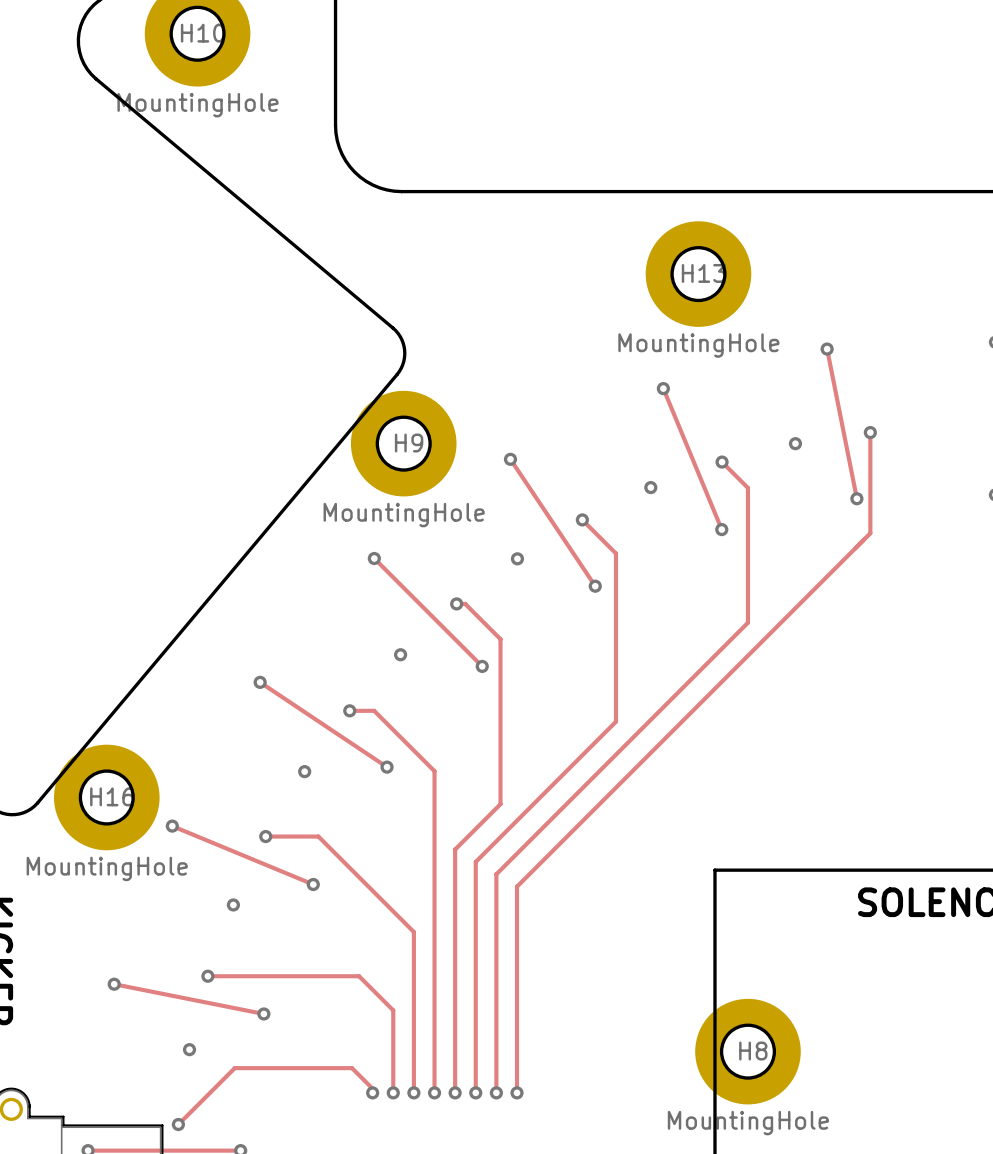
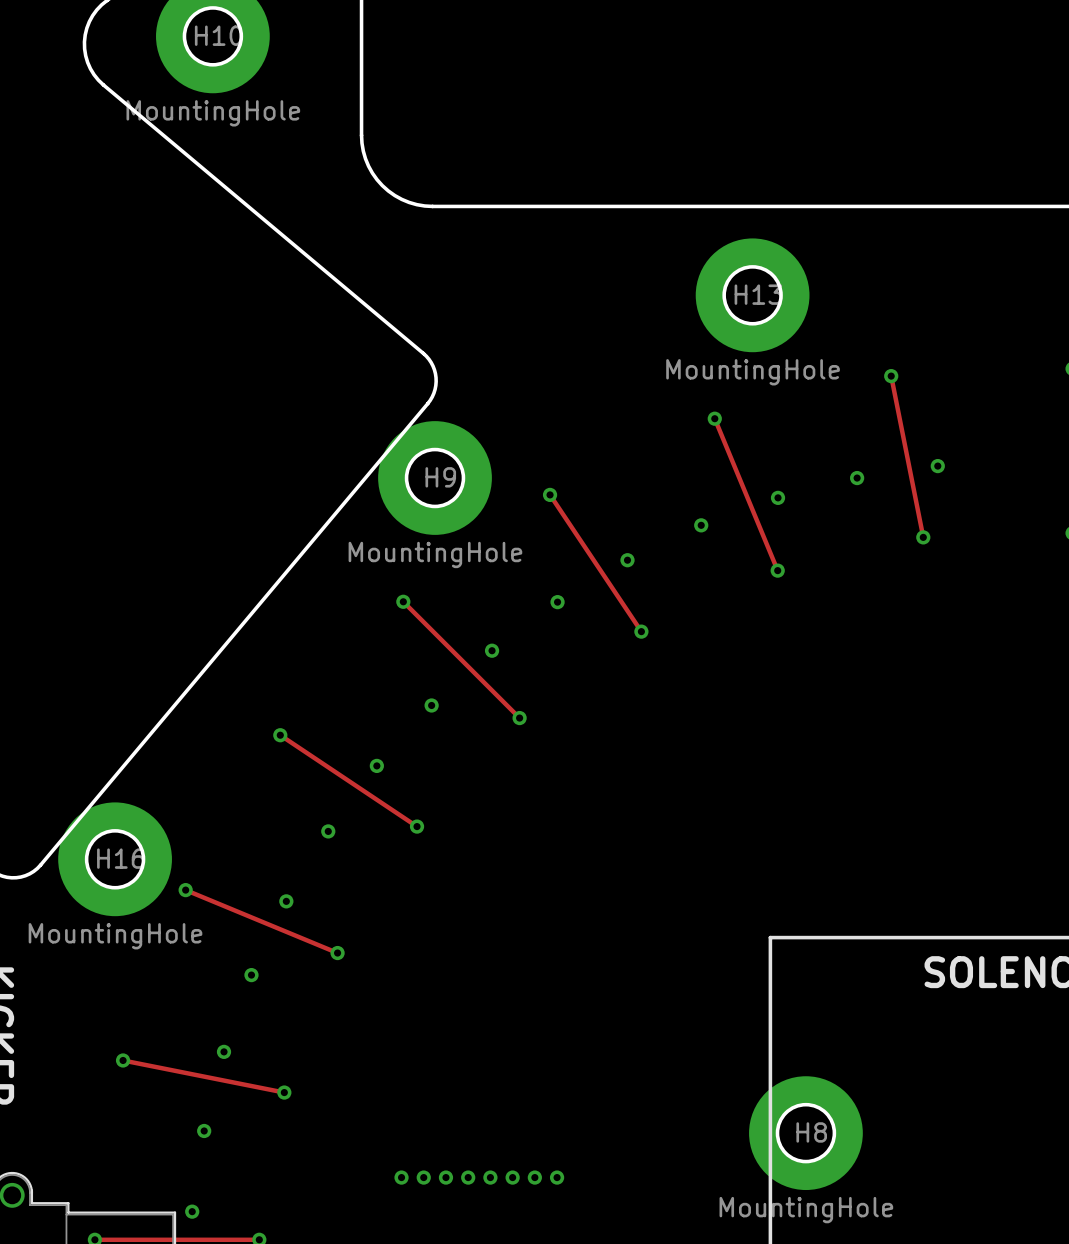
track: (870, 432) (870, 533) -> none
track: (722, 462) (747, 487) (747, 622) (496, 874) (496, 1092) -> none
track: (582, 519) (615, 553) (615, 721) (475, 861) (475, 1092) -> none
track: (870, 533) (517, 886) (517, 1092) -> none
track: (456, 603) (465, 603) (500, 639) (500, 804) (455, 849) (455, 1092) -> none
track: (349, 710) (374, 710) (434, 771) (434, 1092) -> none
track: (265, 836) (318, 836) (413, 932) (413, 1092) -> none
track: (207, 976) (359, 976) (393, 1010) (393, 1092) -> none
track: (372, 1092) (372, 1088) (352, 1068) (234, 1068) (178, 1124) -> none

